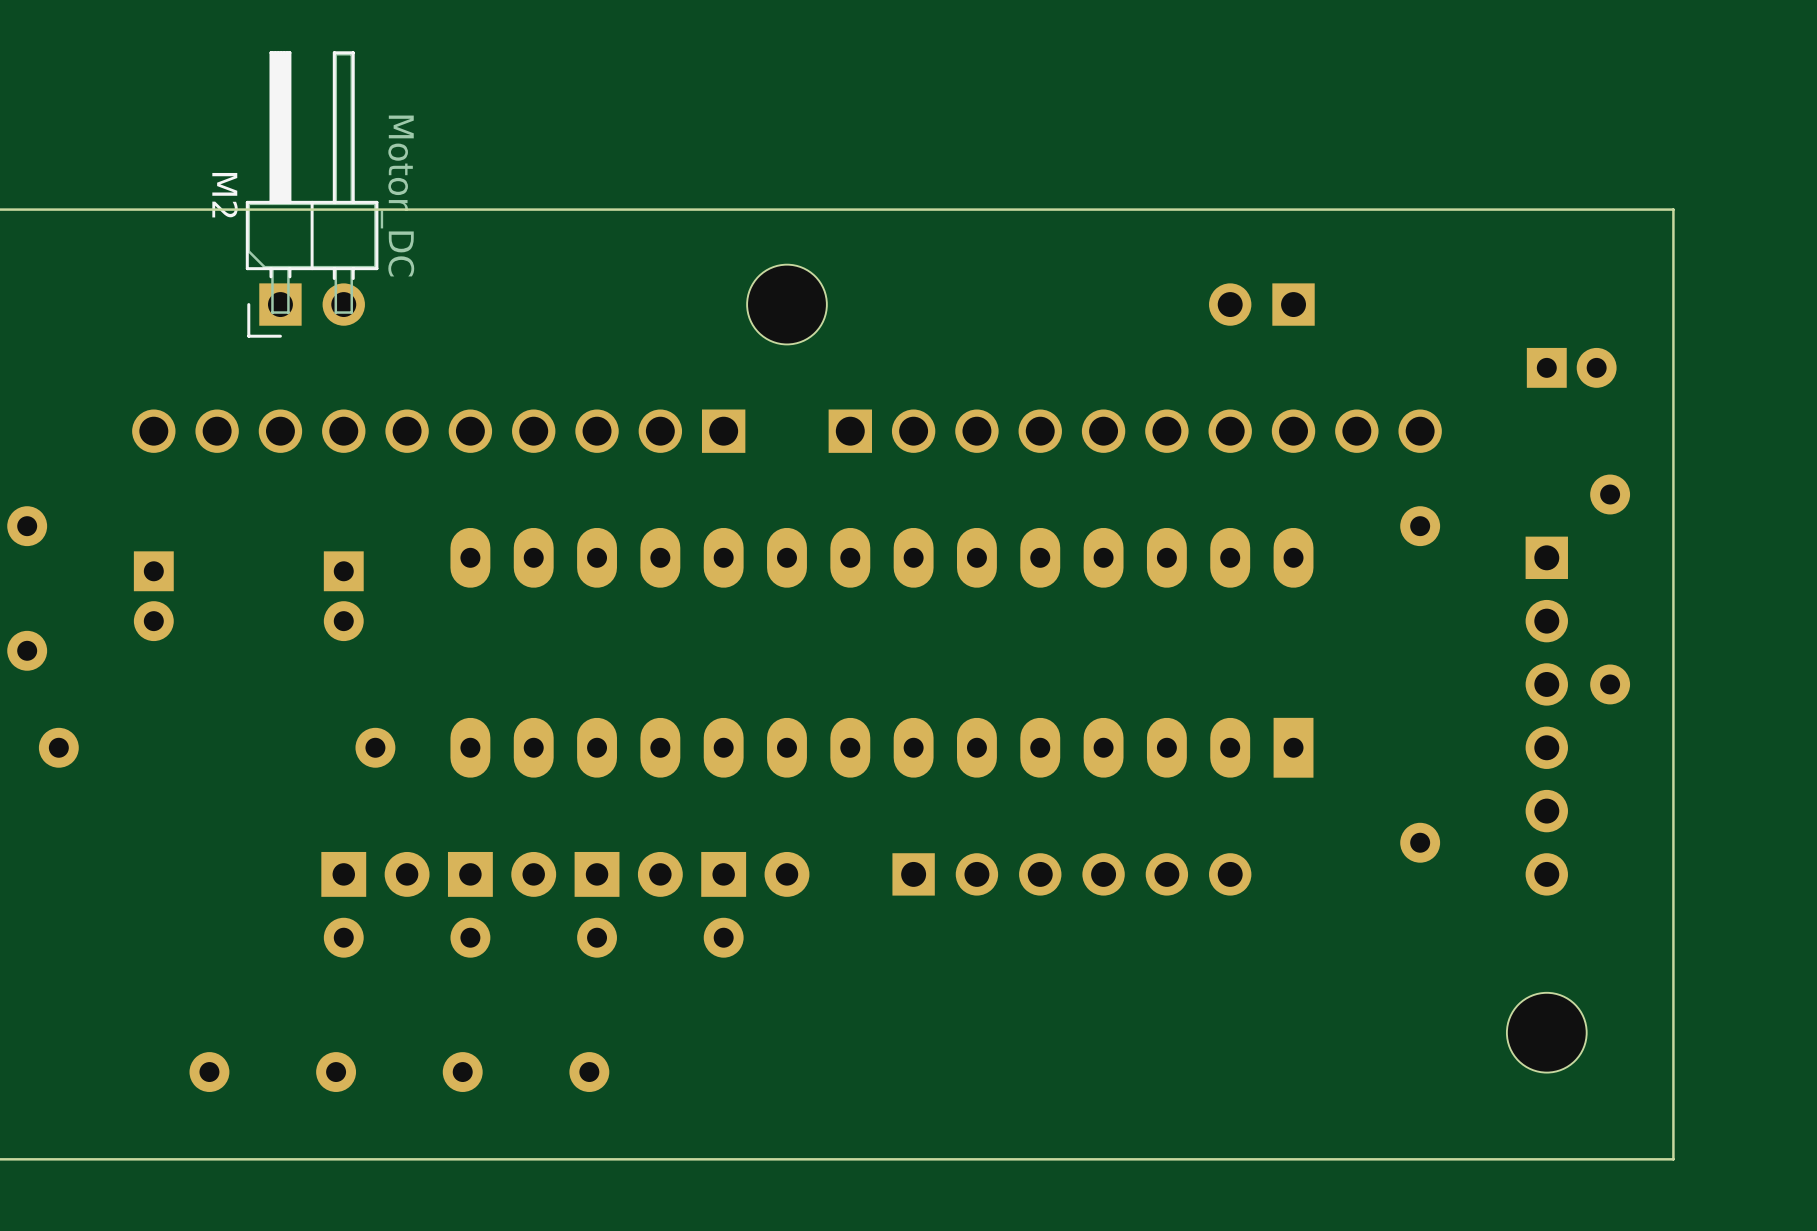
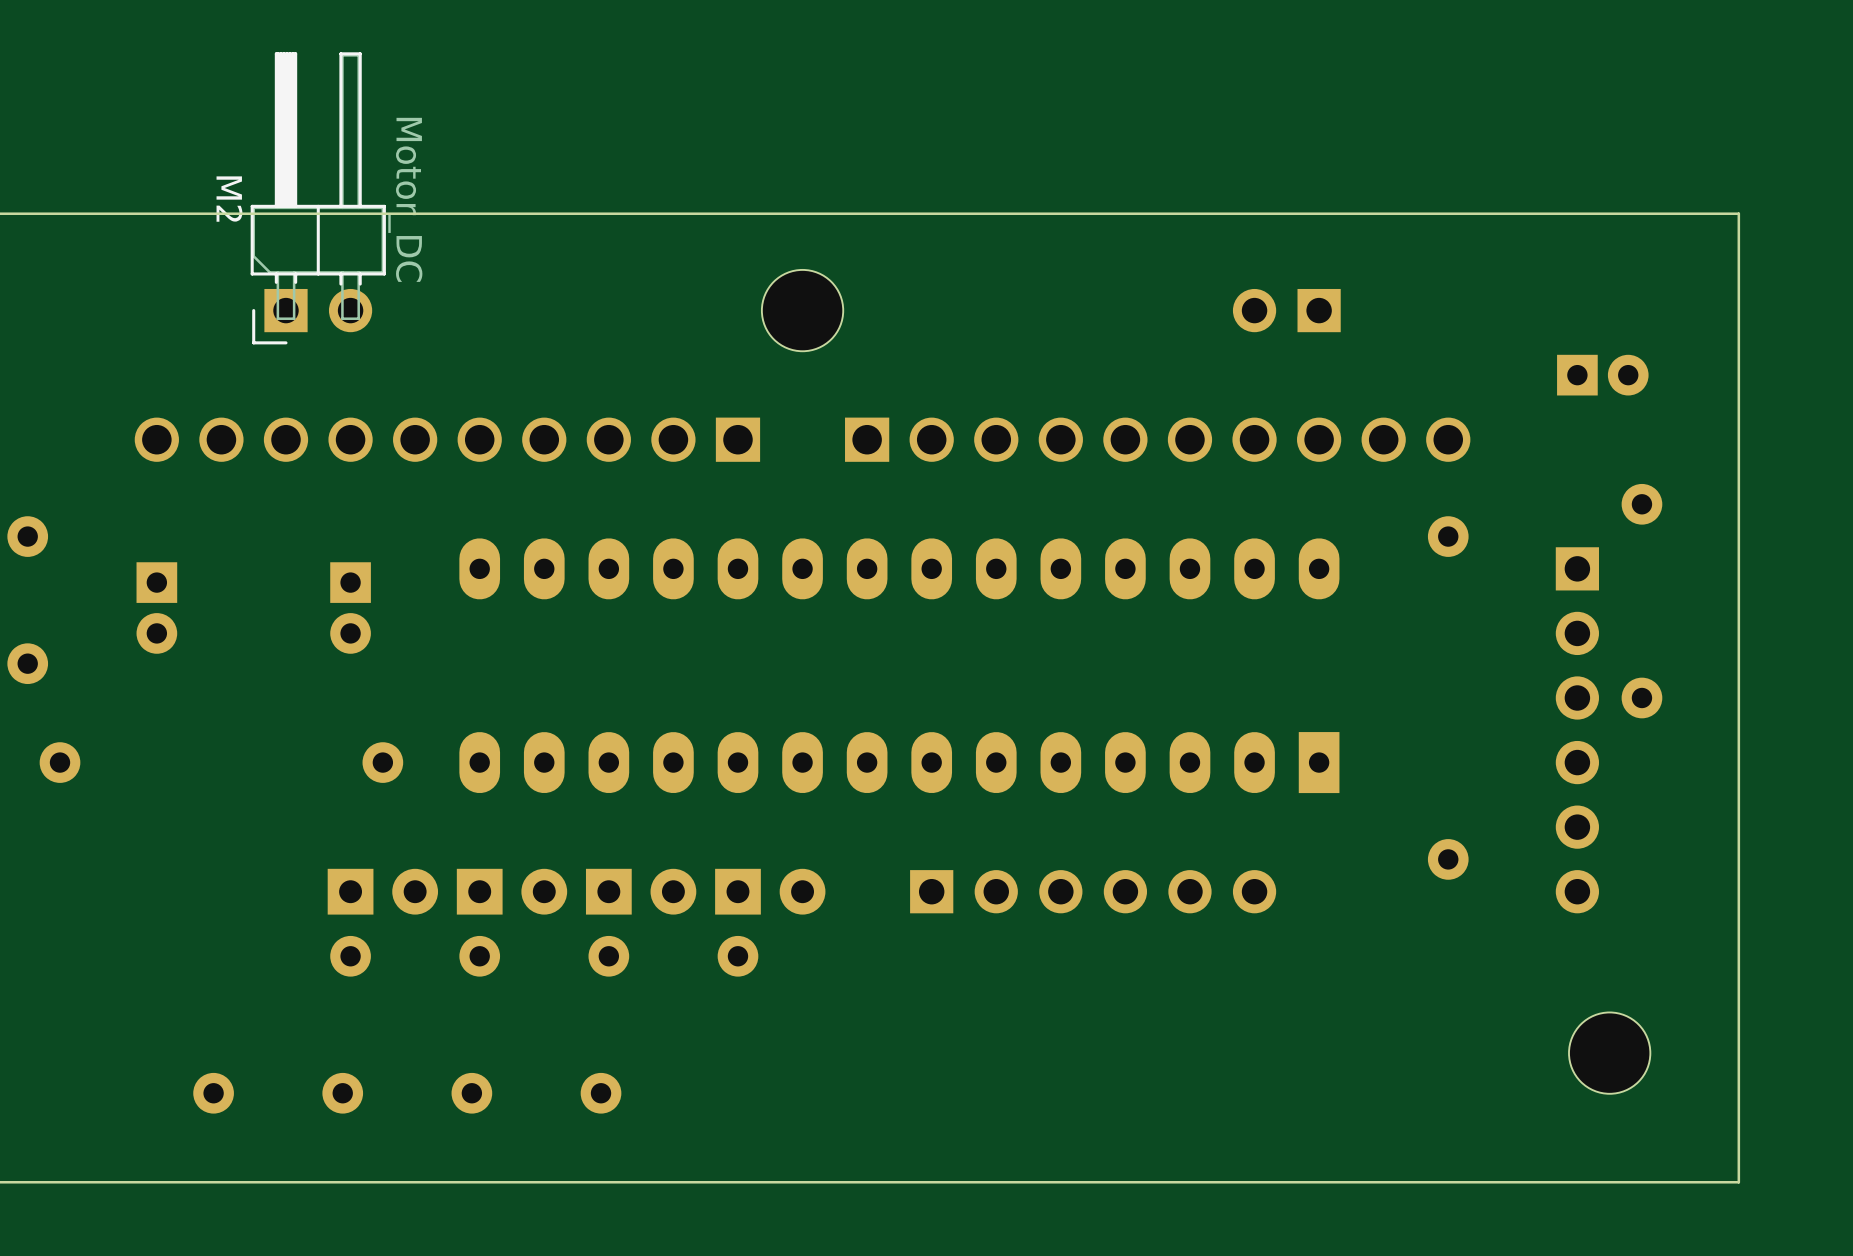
board edge: (1673, 209) (1673, 1159) -> (1706, 213) (1738, 213) (1738, 1182) (1706, 1182)
part position: (1546, 1032) -> (1609, 1053)

